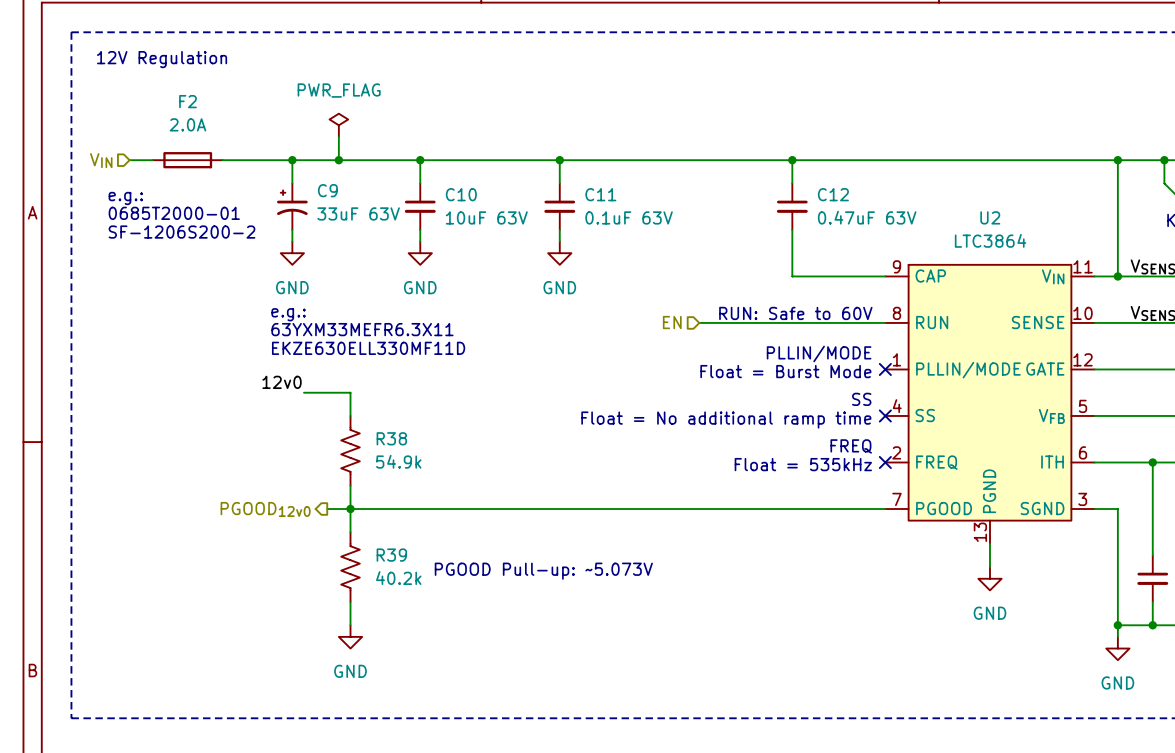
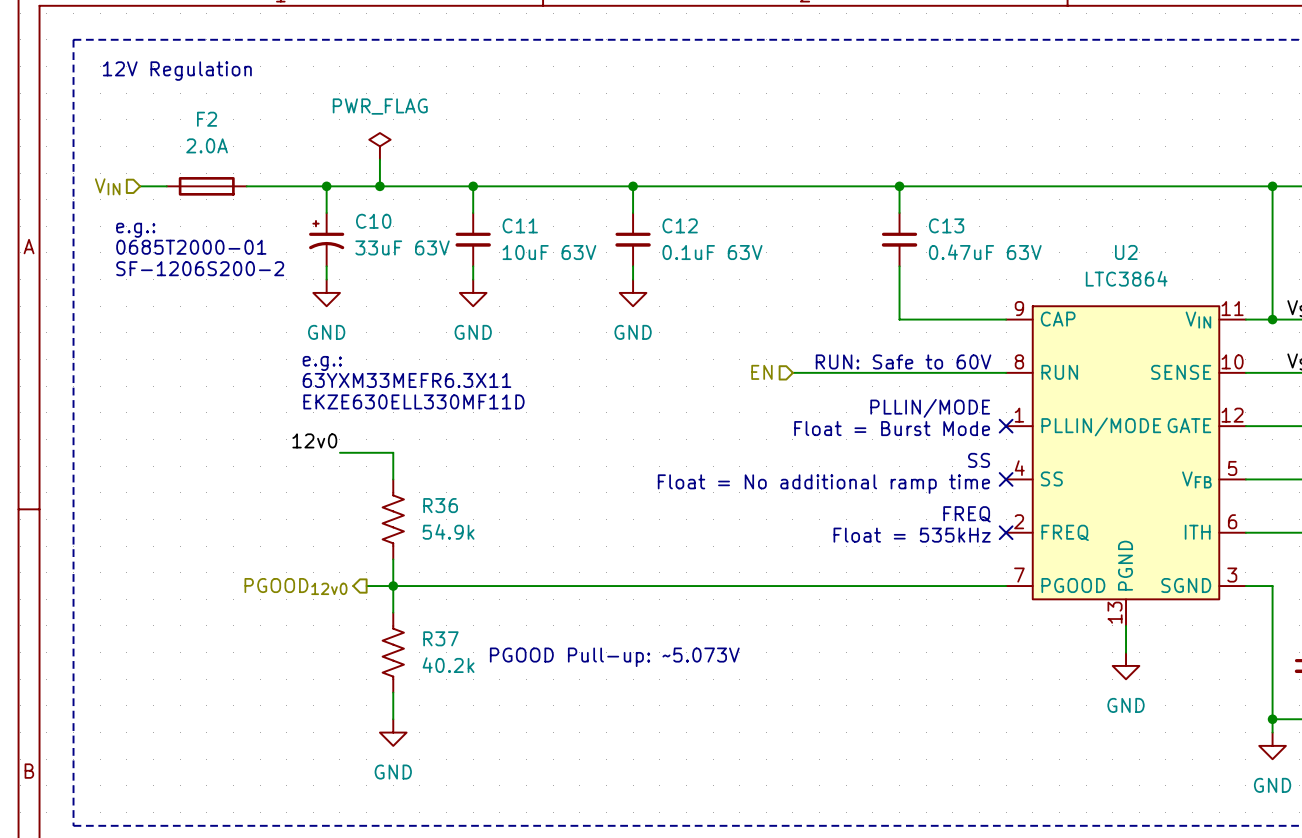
C9 name: C9 (327, 190) -> C10 (373, 221)
C10 name: C10 (461, 194) -> C11 (520, 225)
C11 name: C11 (600, 194) -> C12 (680, 225)
C12 name: C12 (833, 194) -> C13 (946, 225)
R38 name: R38 (391, 438) -> R36 (440, 505)
R39 name: R39 (391, 555) -> R37 (440, 638)

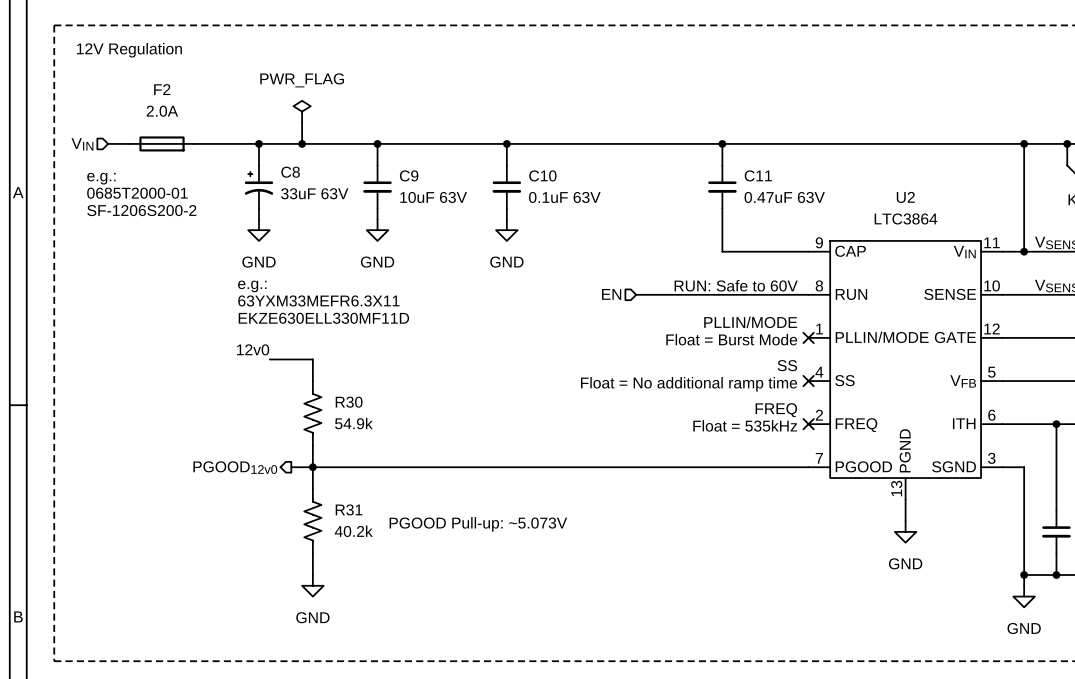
C10 name: C10 (373, 221) -> C8 (290, 172)
C11 name: C11 (520, 225) -> C9 (409, 175)
C12 name: C12 (680, 225) -> C10 (542, 175)
C13 name: C13 (946, 225) -> C11 (758, 175)
R36 name: R36 (440, 505) -> R30 (349, 402)
R37 name: R37 (440, 638) -> R31 (349, 509)

